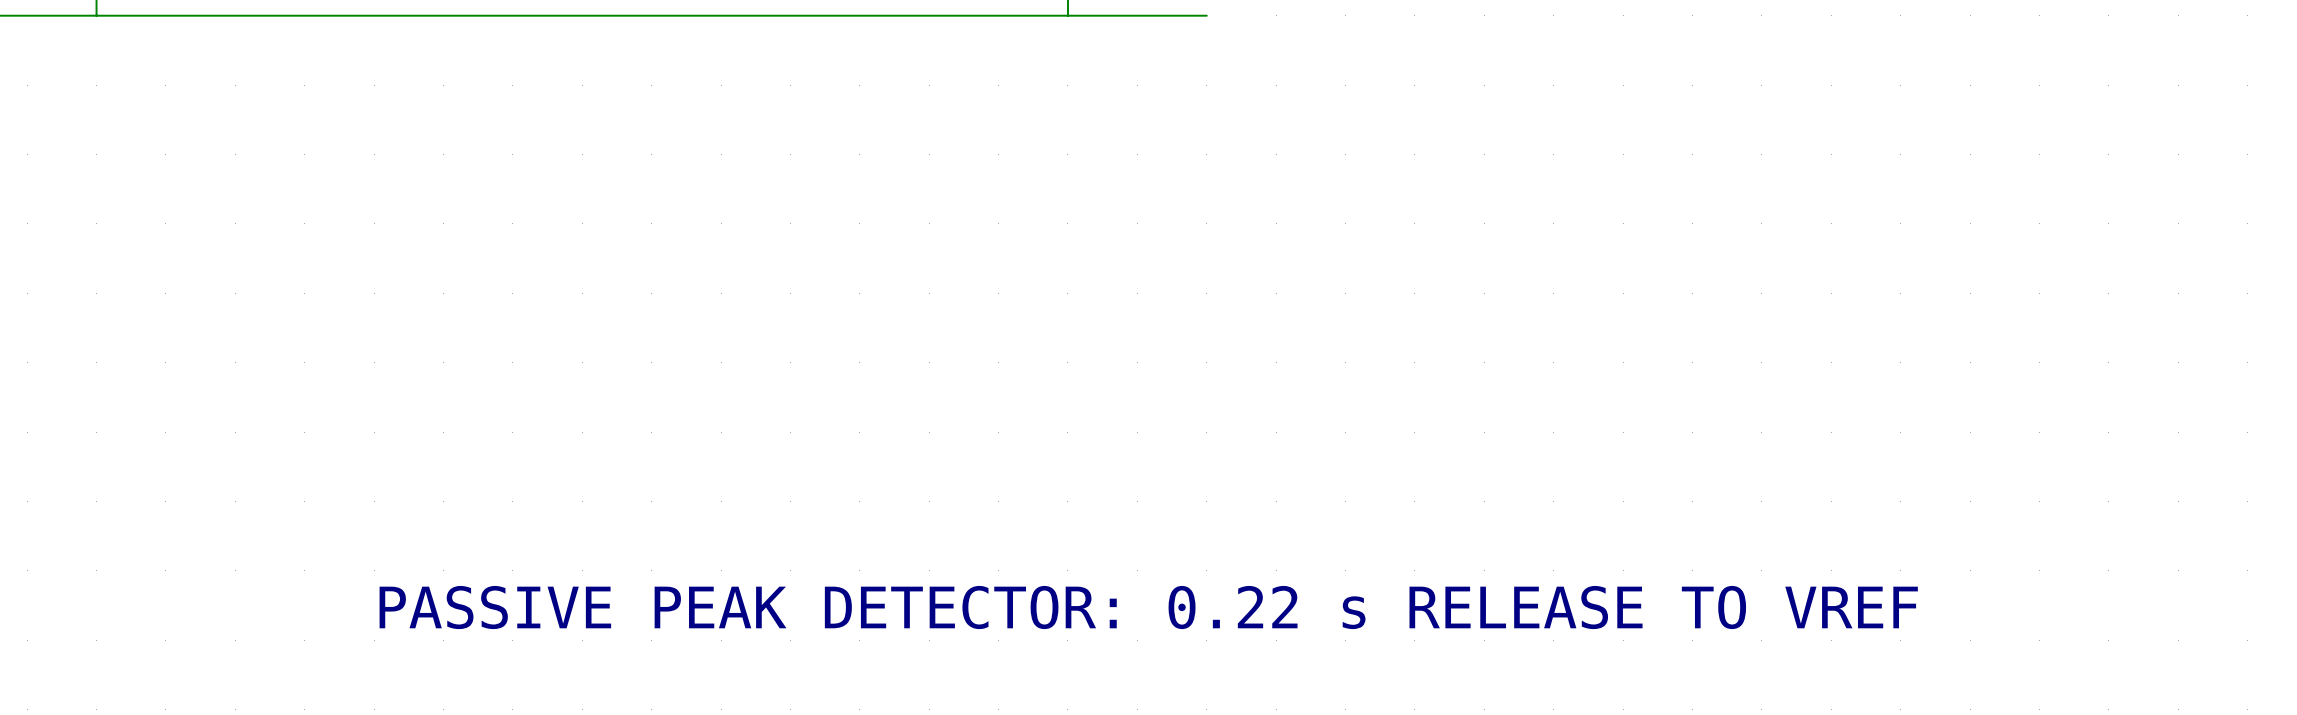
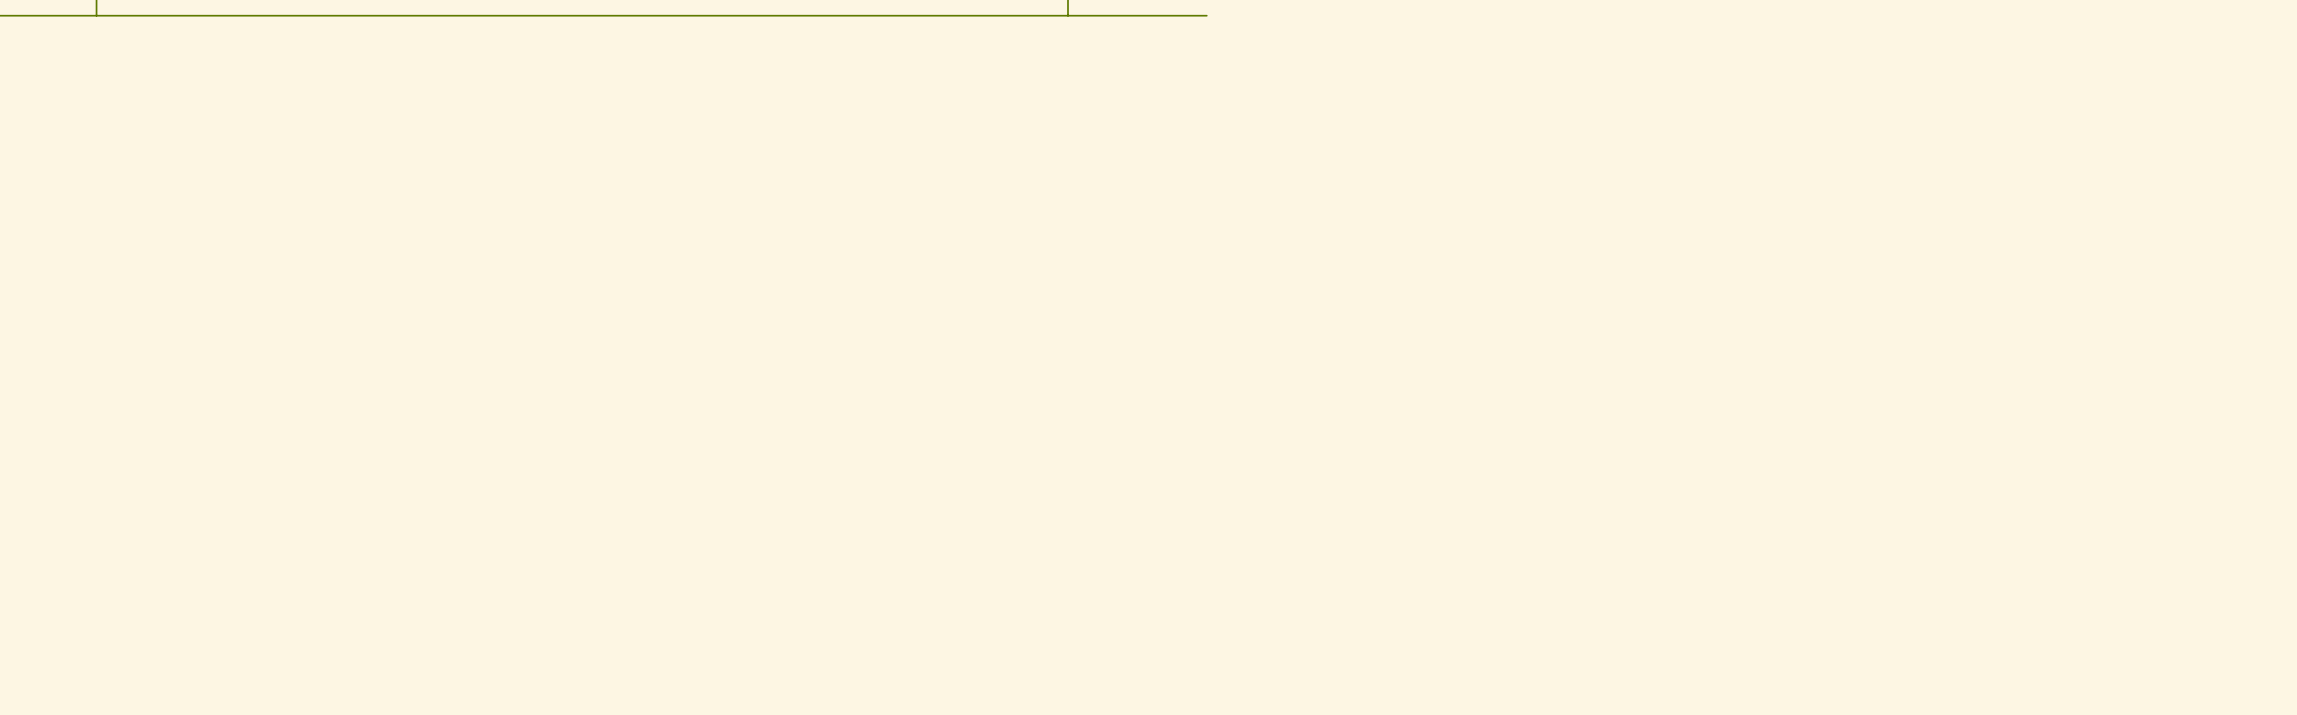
text: PASSIVE PEAK DETECTOR: 0.22 s RELEASE TO VREF (1148, 607) -> none

